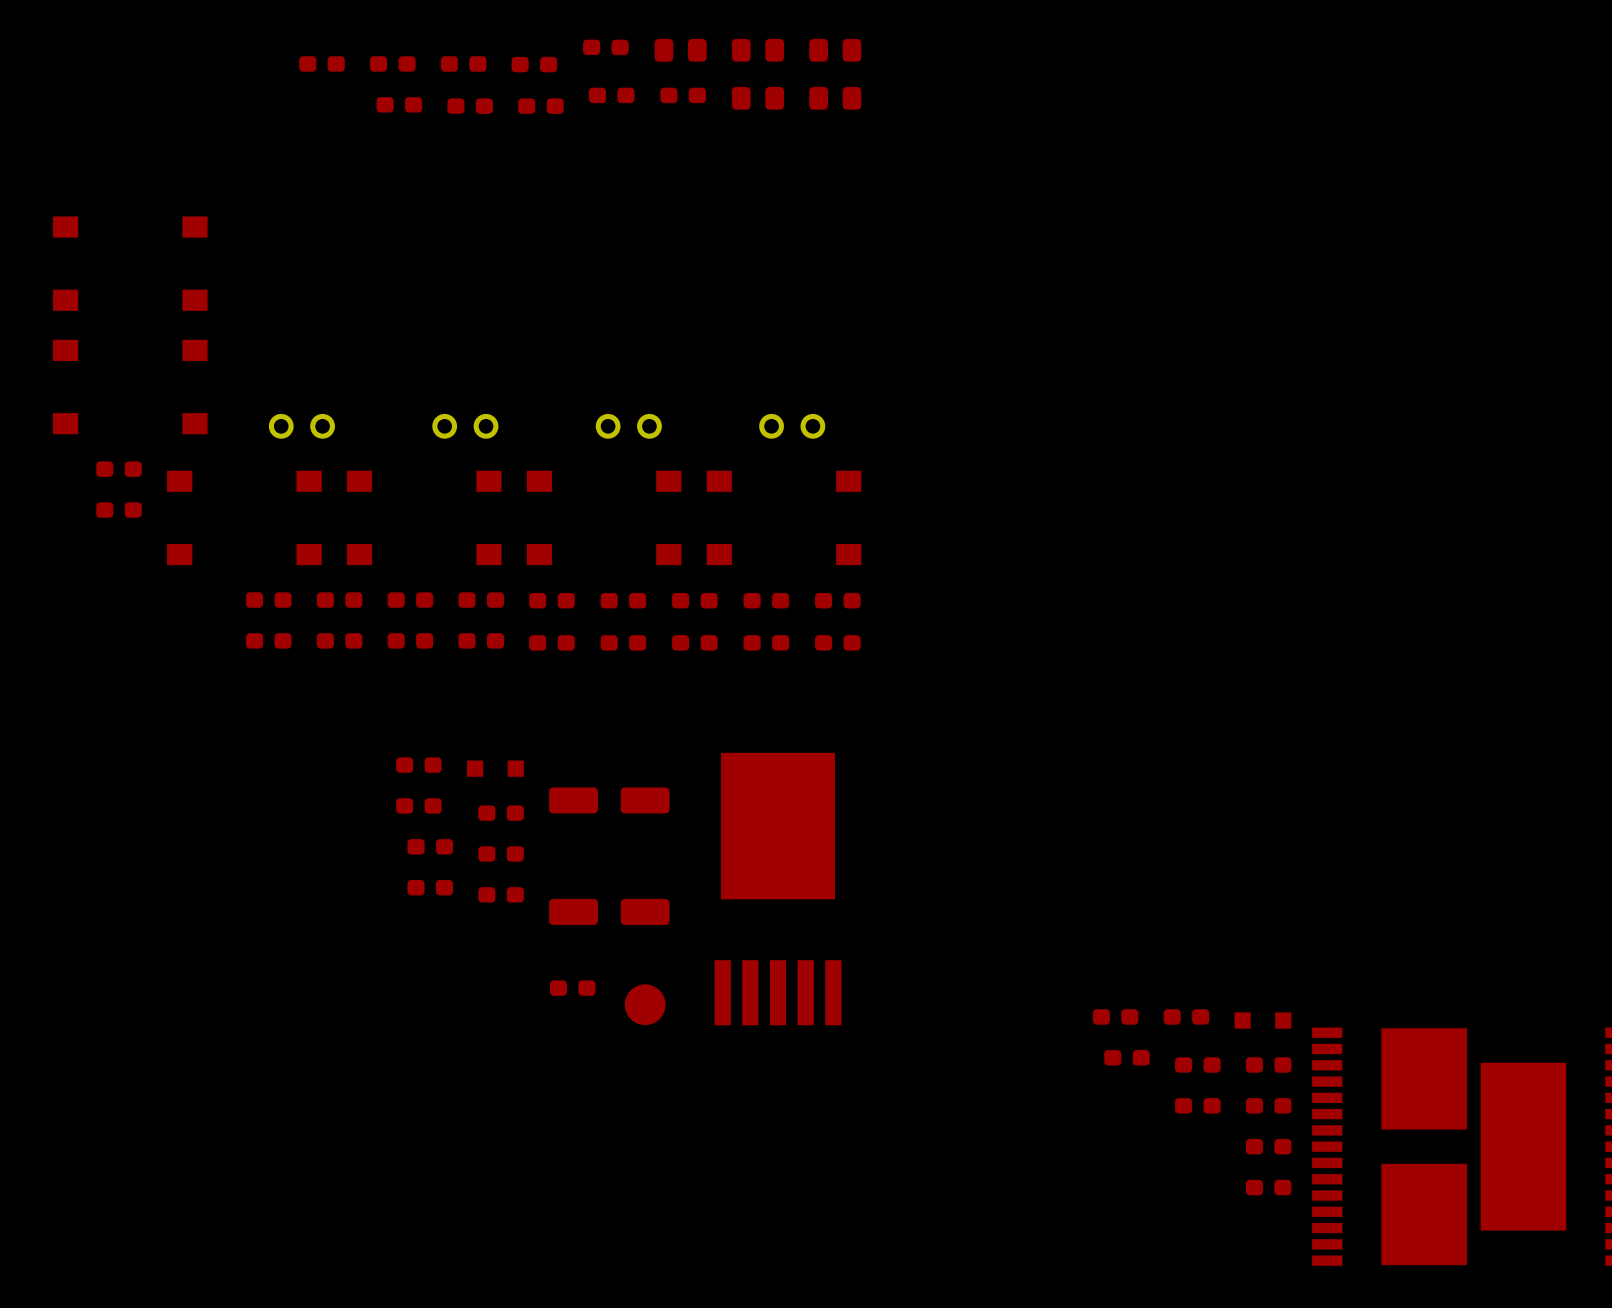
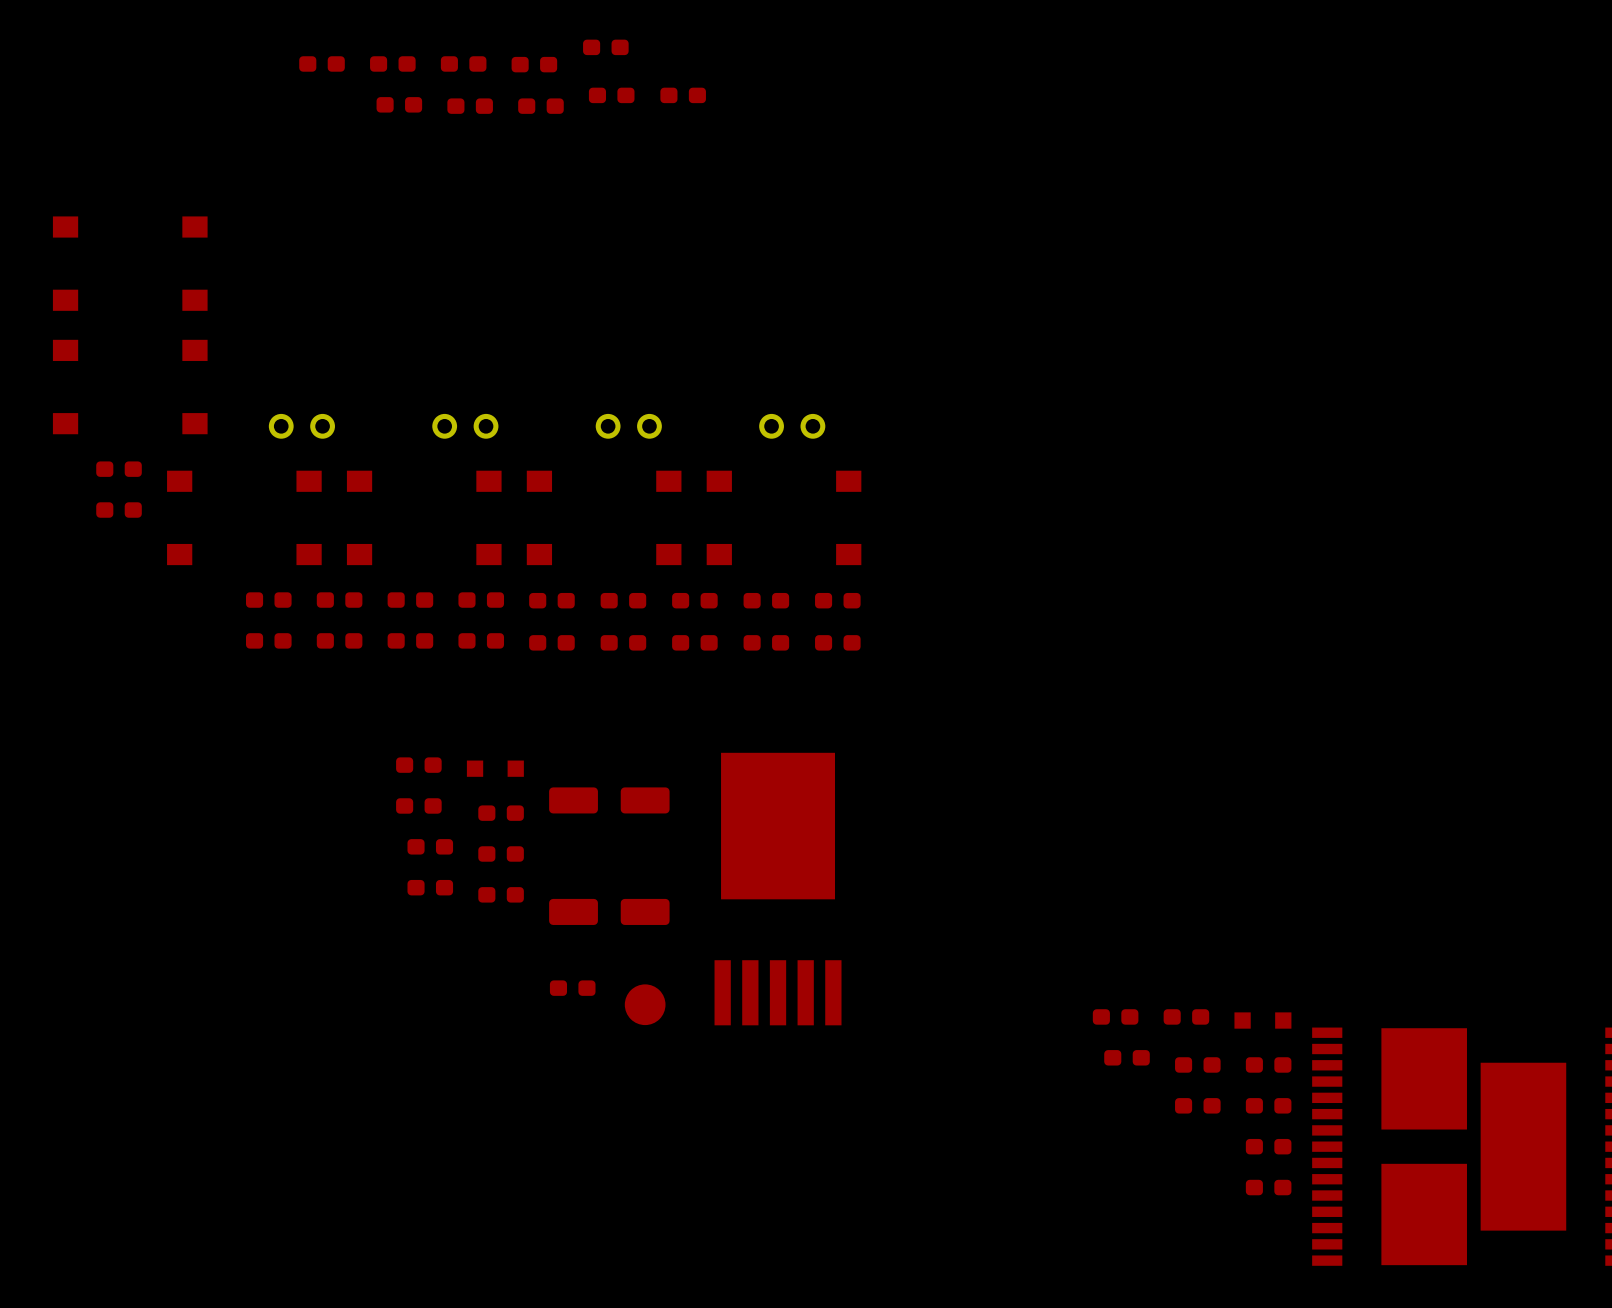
part: (680, 50) -> none
part: (757, 50) -> none
part: (835, 50) -> none
part: (757, 98) -> none
part: (835, 98) -> none

